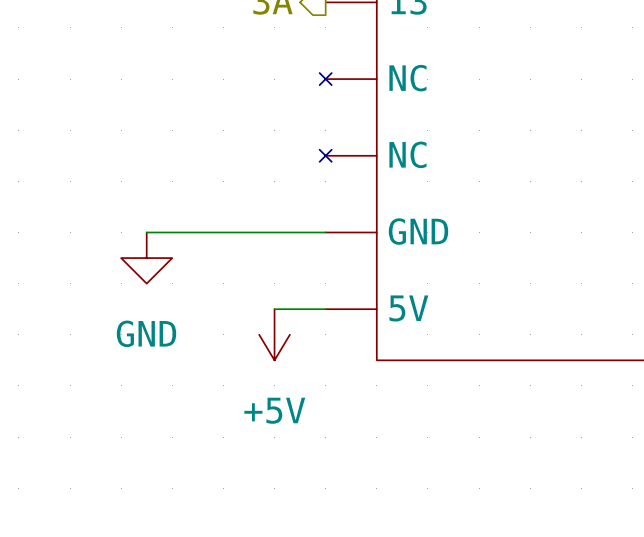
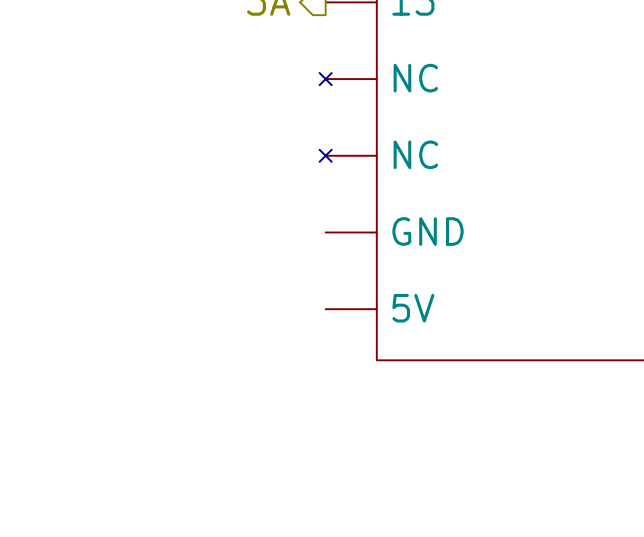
wire: (146, 232) (325, 232) -> none
power symbol: GND (146, 258) -> none
wire: (274, 309) (325, 309) -> none
power symbol: +5V (274, 334) -> none

